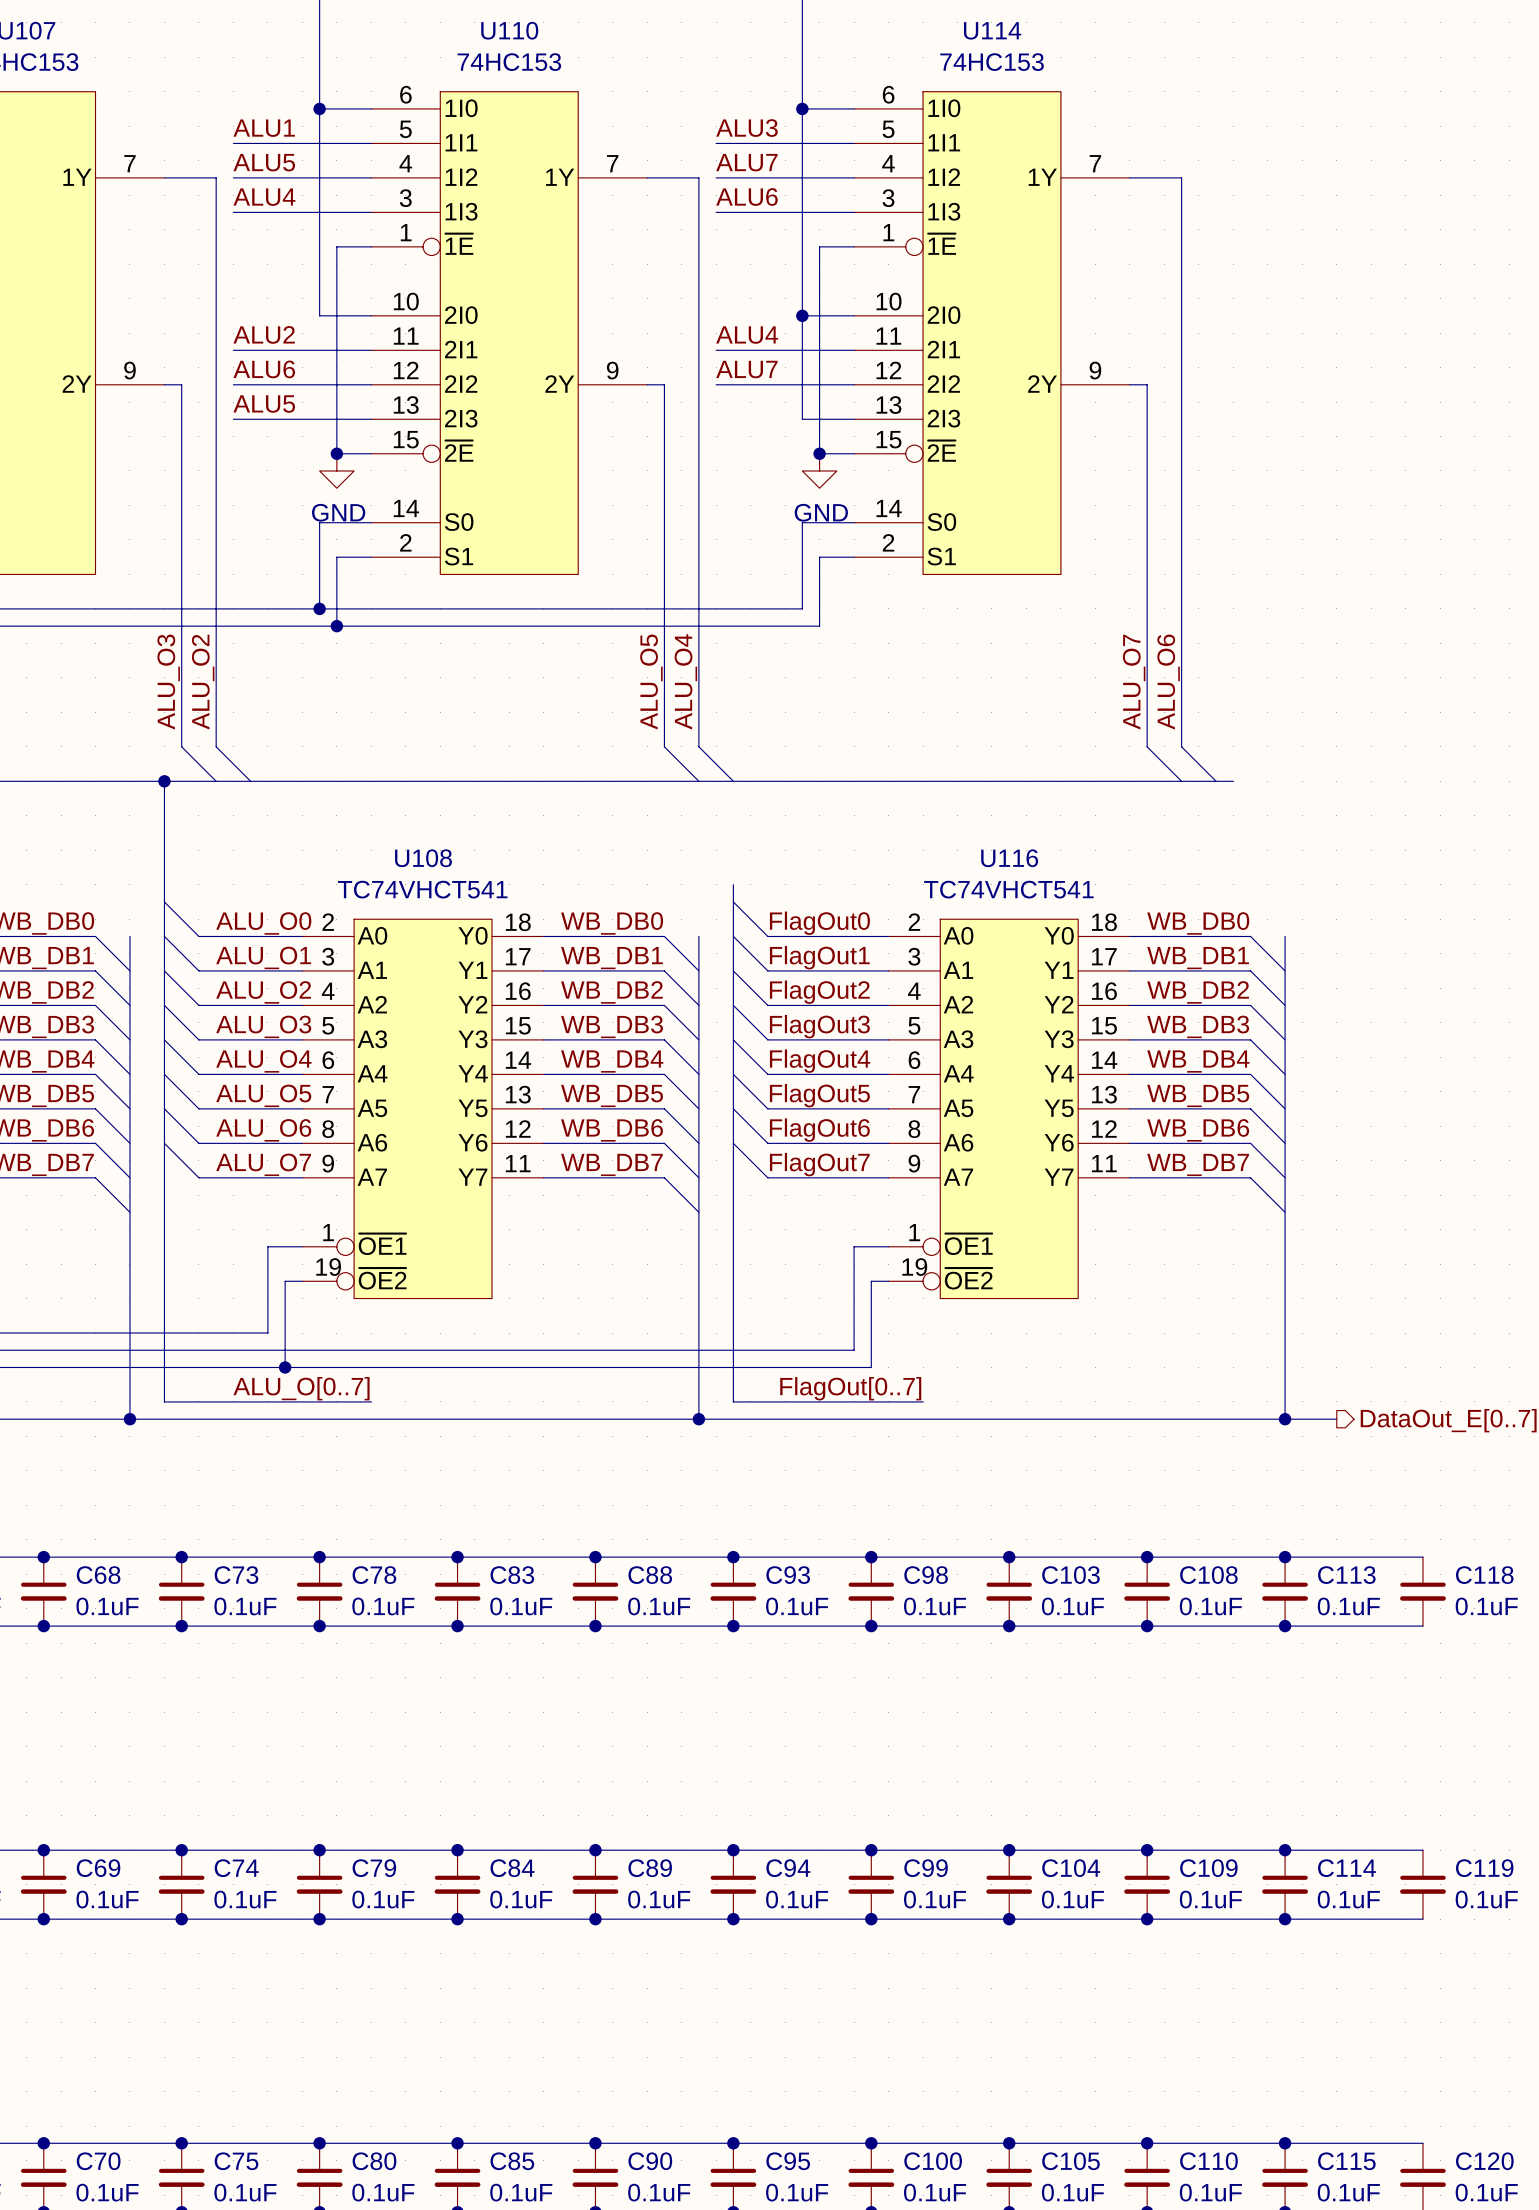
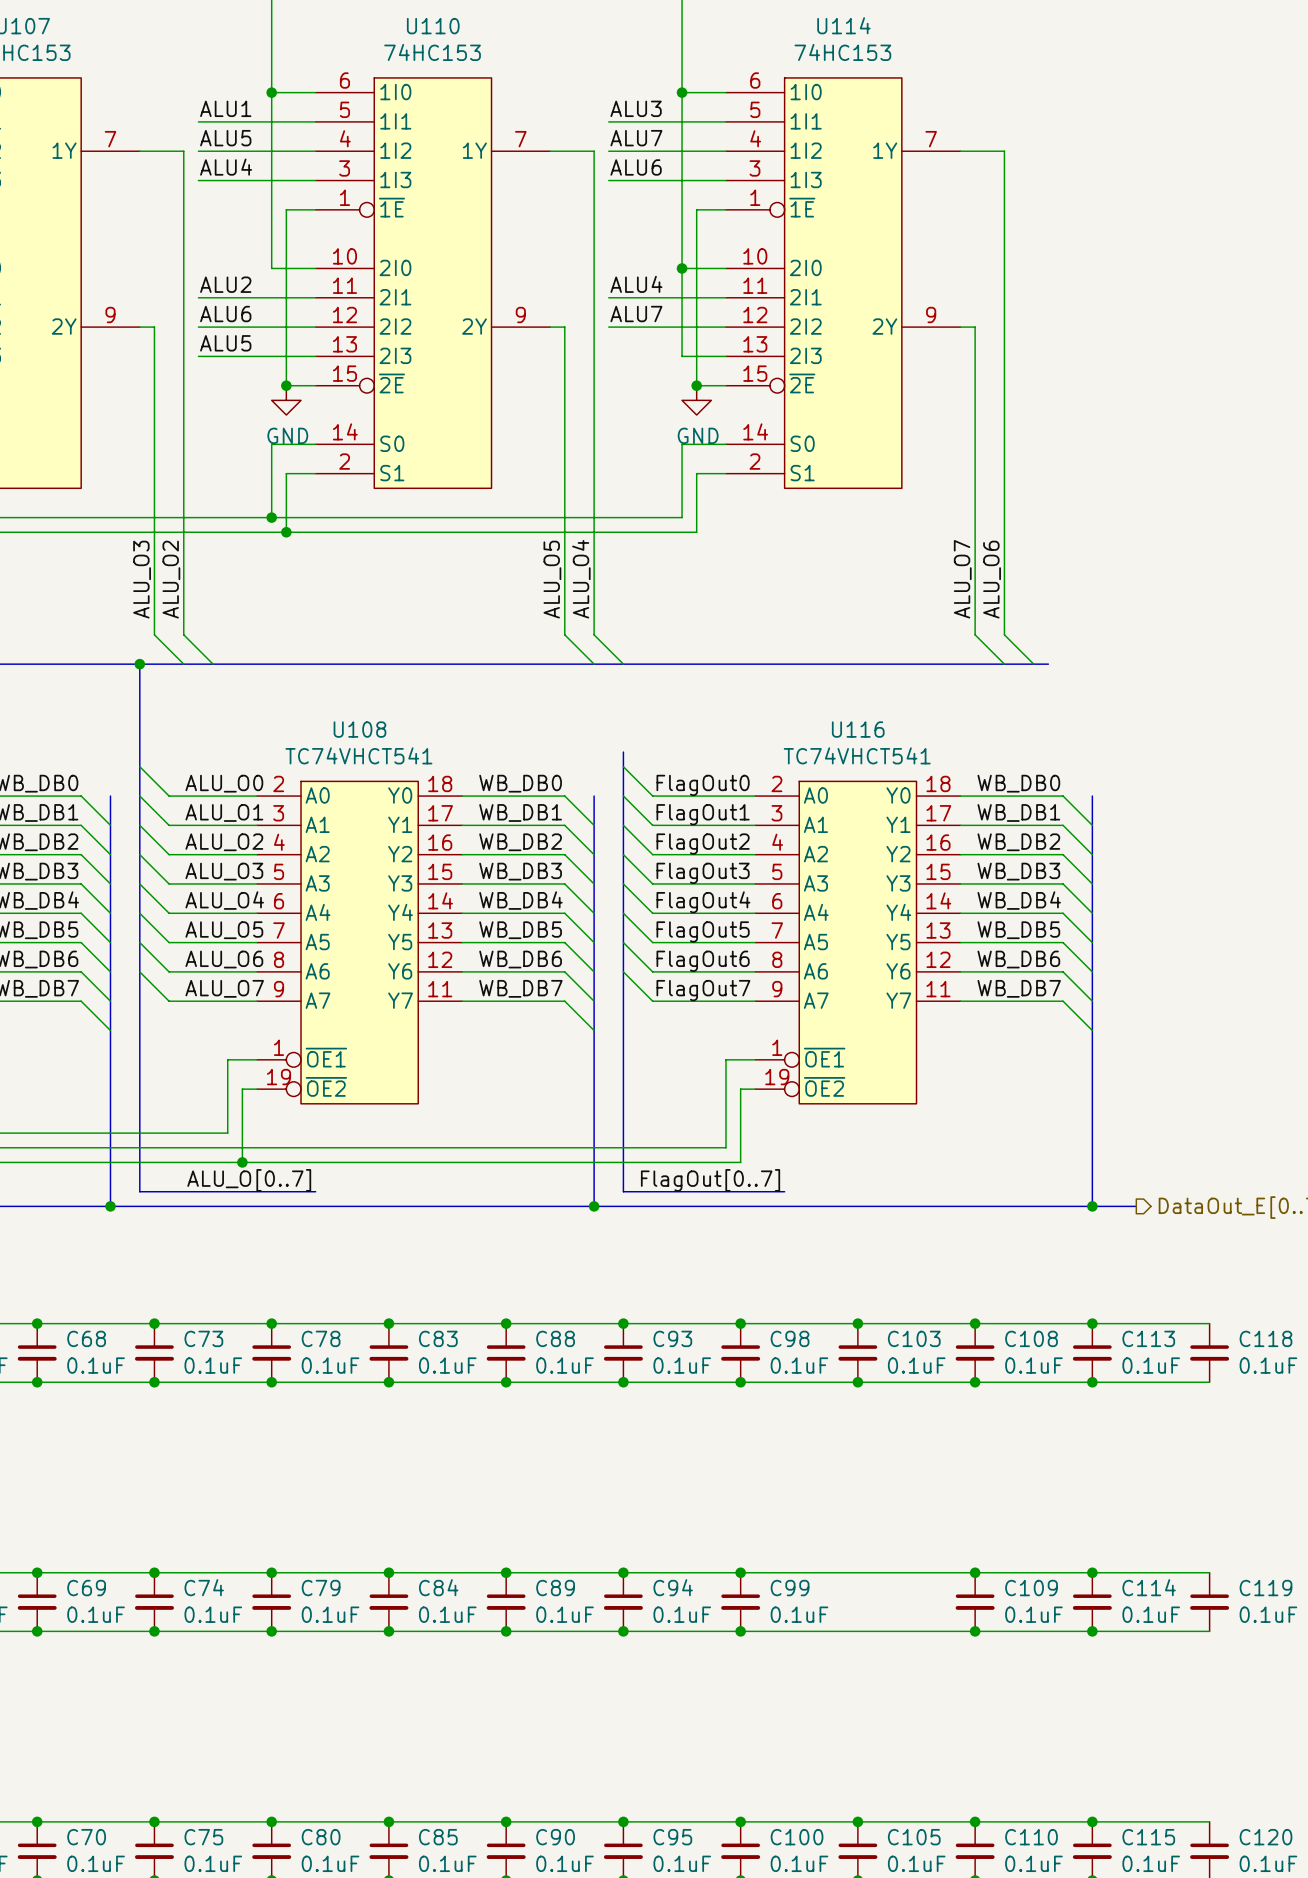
junction: (1009, 1850) -> none
C104: 0.1uF (1009, 1884) -> none
junction: (1009, 1919) -> none

